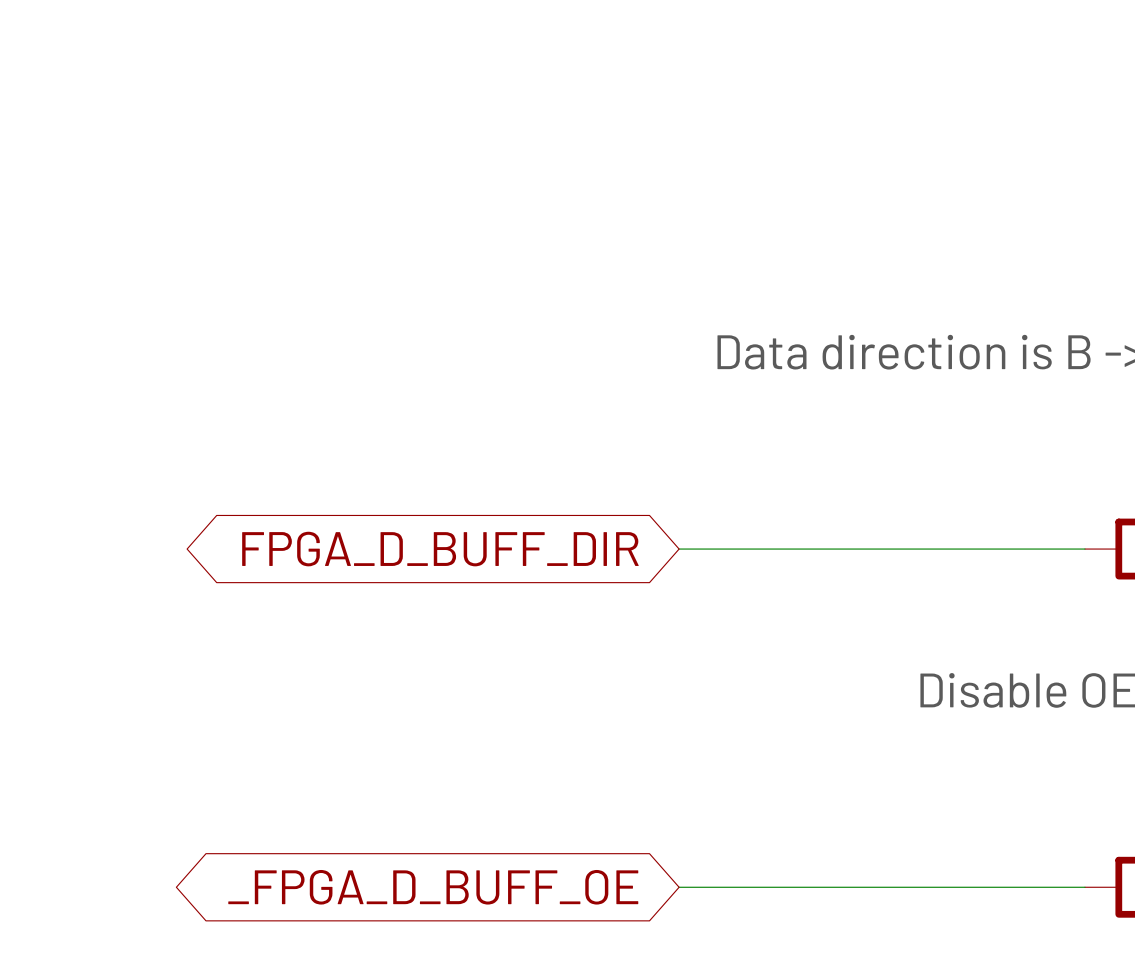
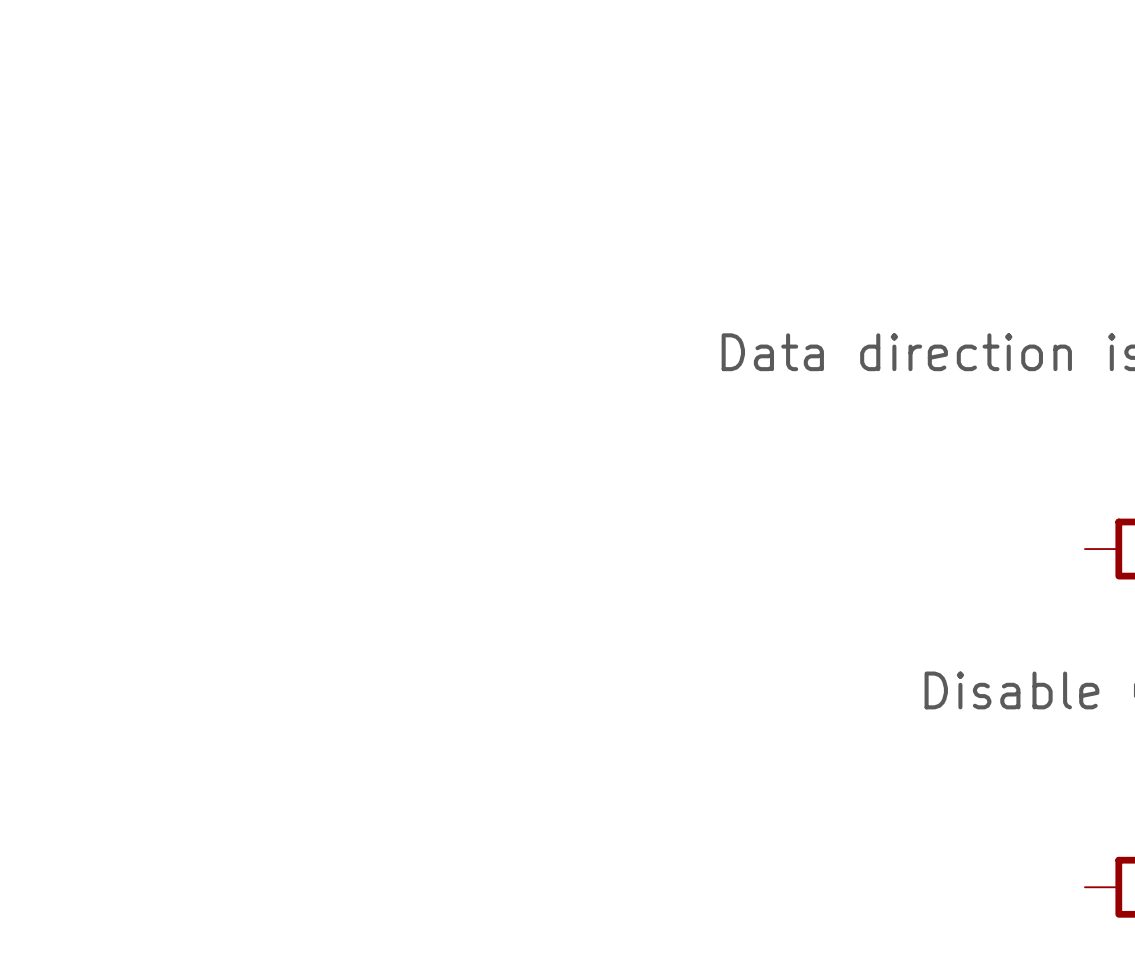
global label: FPGA_D_BUFF_DIR (440, 549) -> none
wire: (679, 549) (1084, 549) -> none
global label: _FPGA_D_BUFF_OE (433, 887) -> none
wire: (679, 887) (1084, 887) -> none

